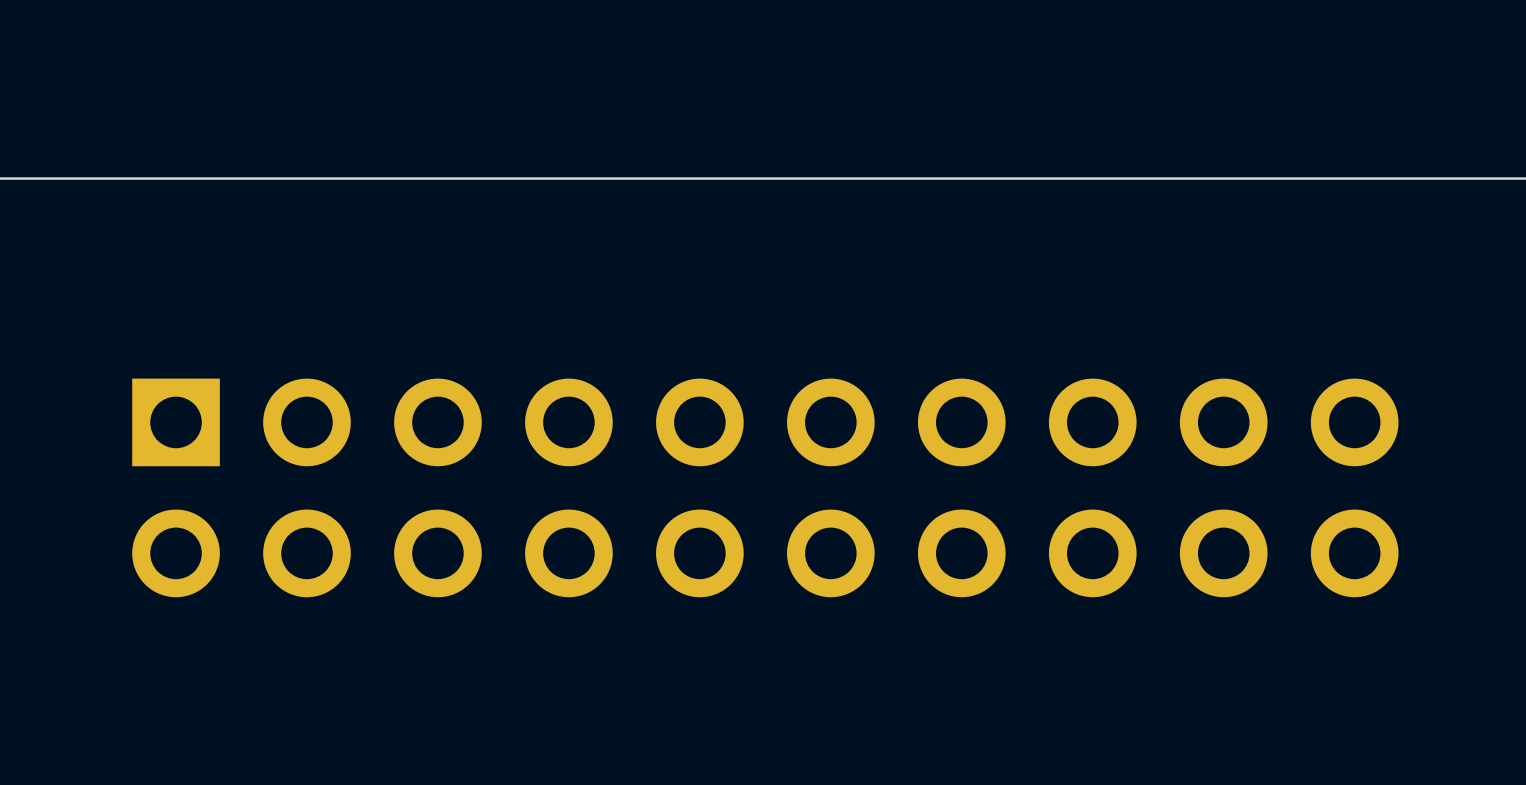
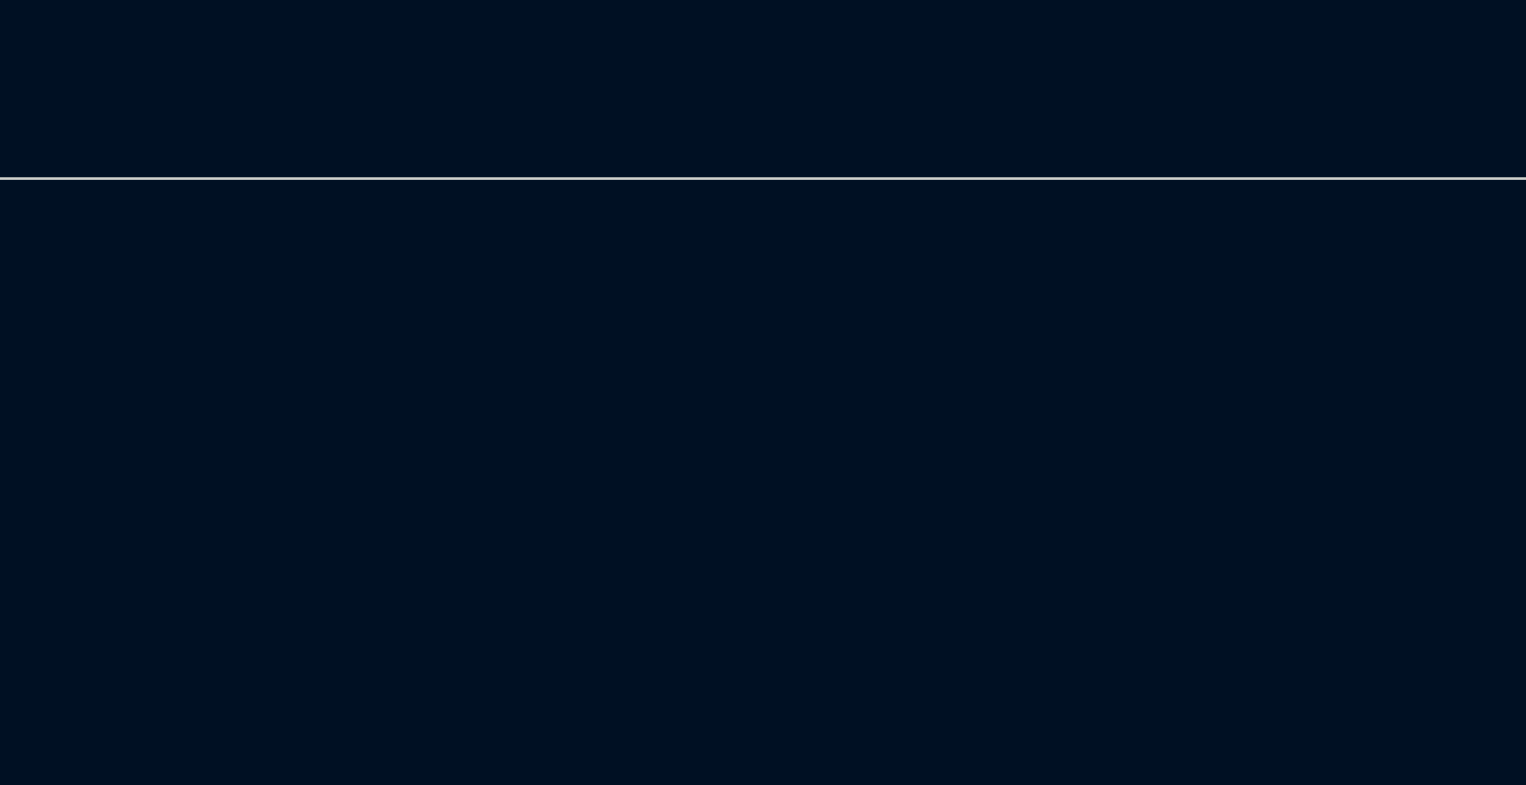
part: (765, 487) -> none

